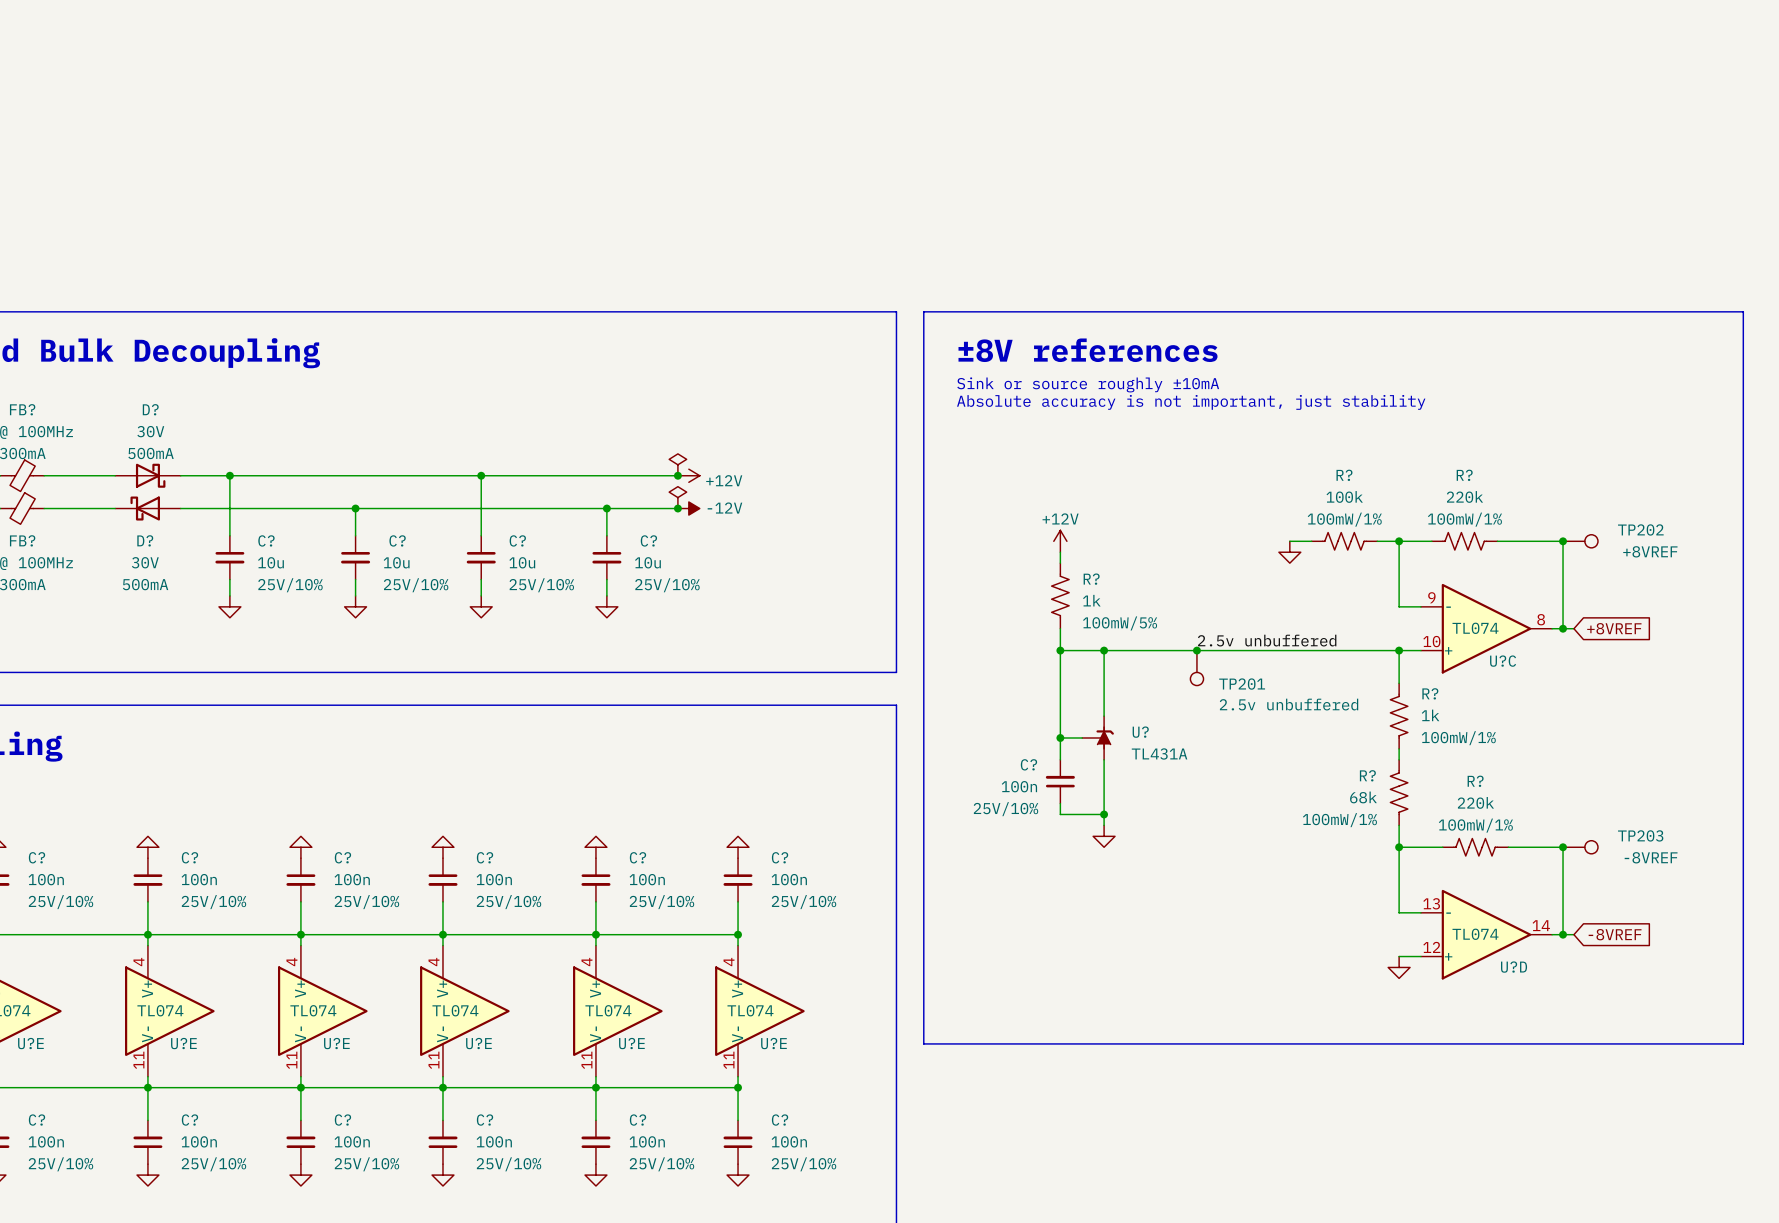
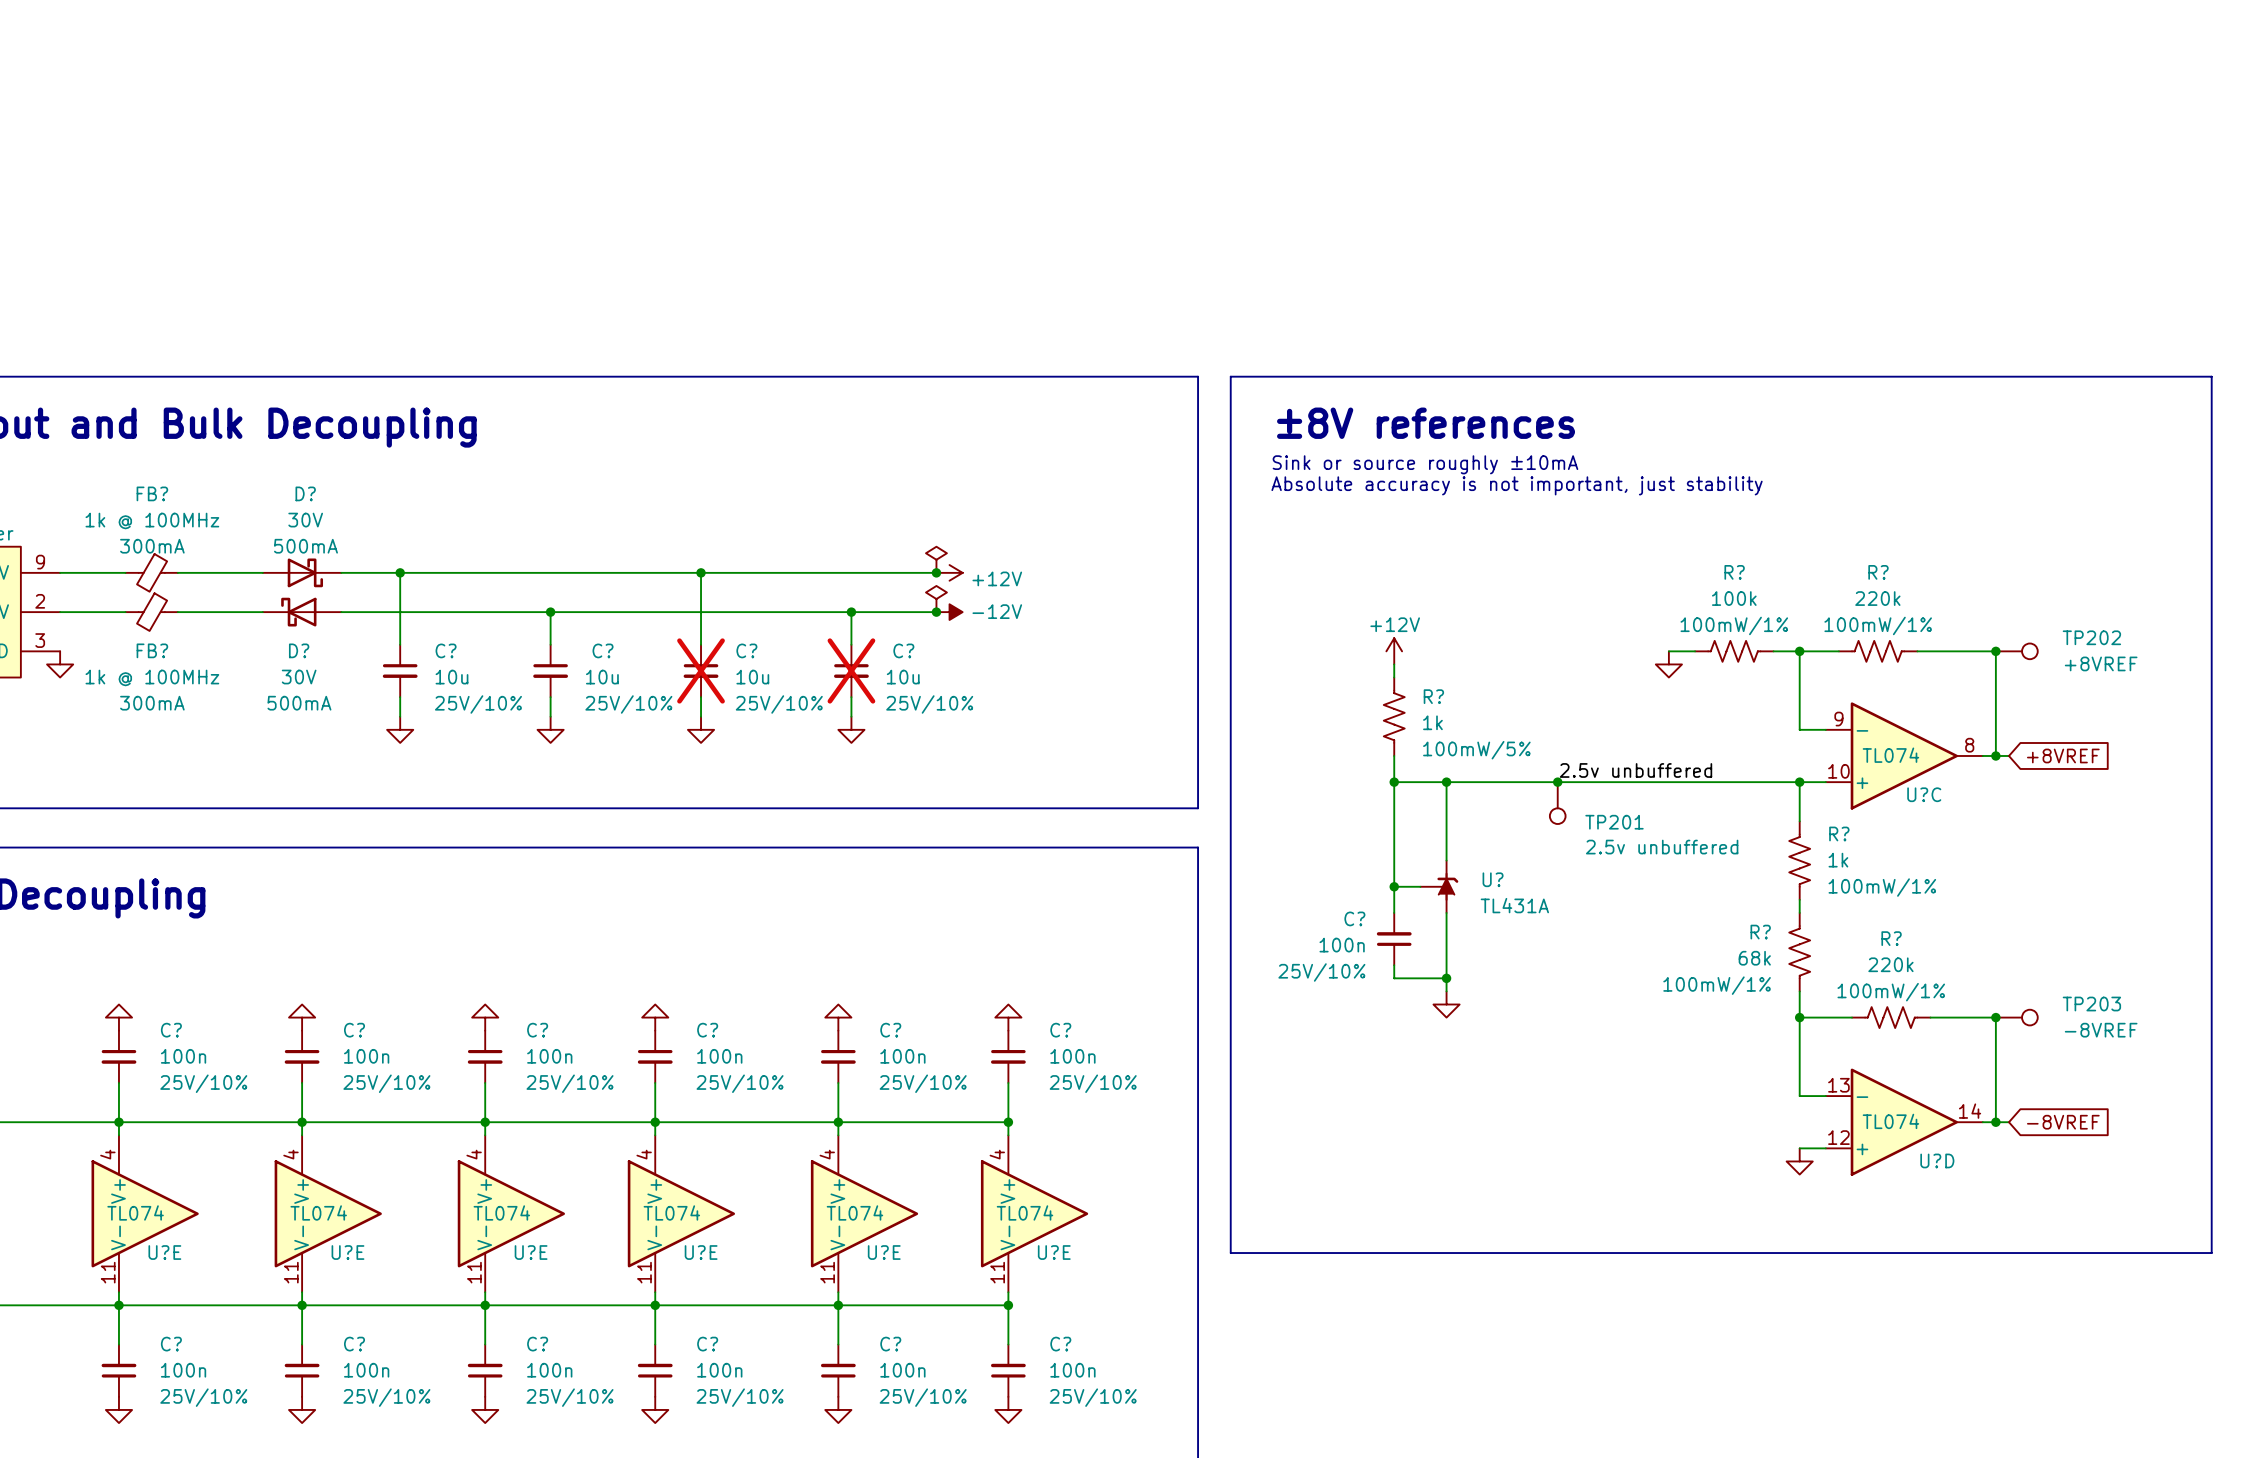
C? do-not-place cross: none -> (701, 670)
C? do-not-place cross: none -> (851, 670)

